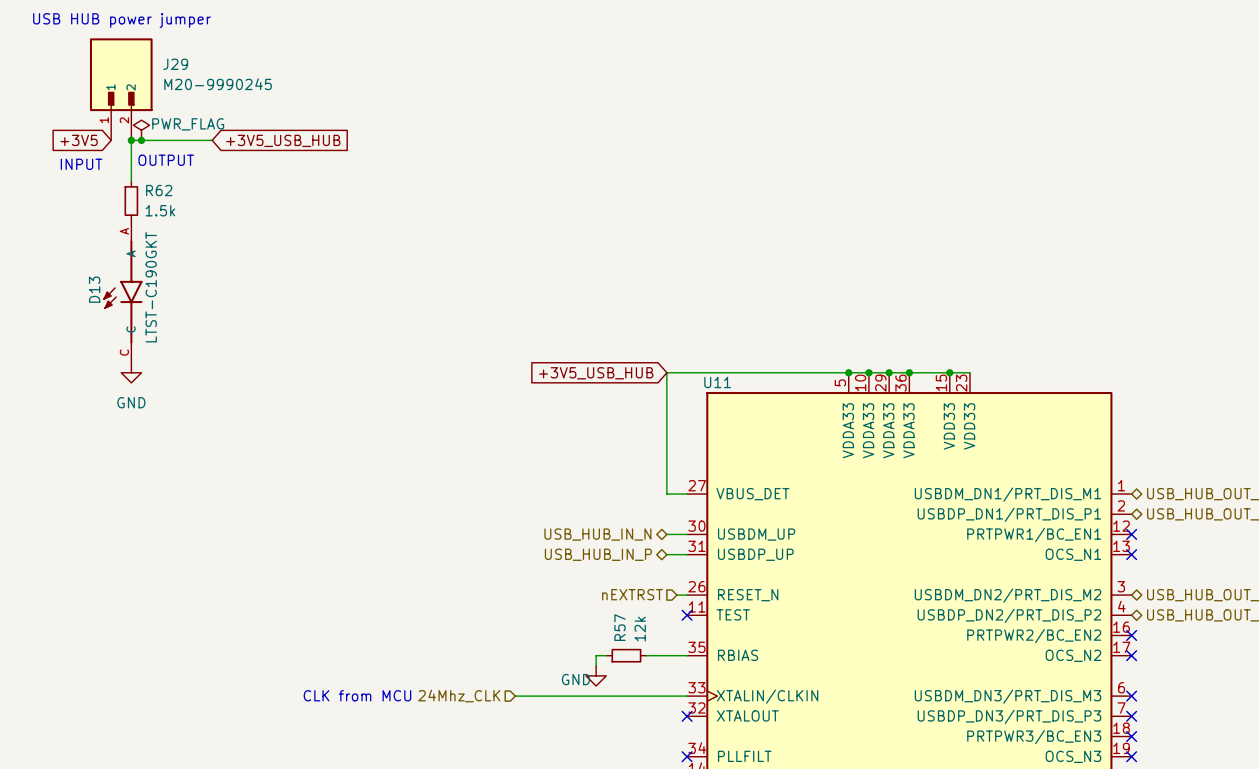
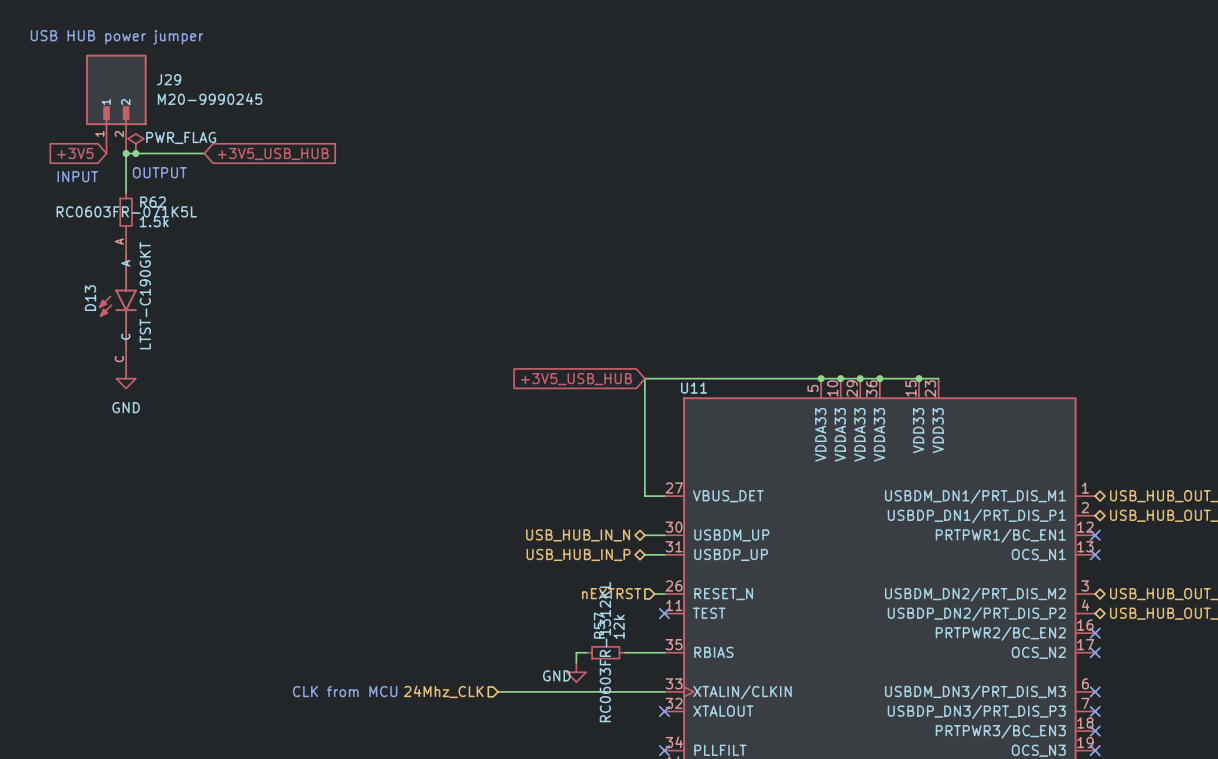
R62 text: none -> RC0603FR-071K5L (126, 211)
R57 text: none -> RC0603FR-1312KL (605, 652)

